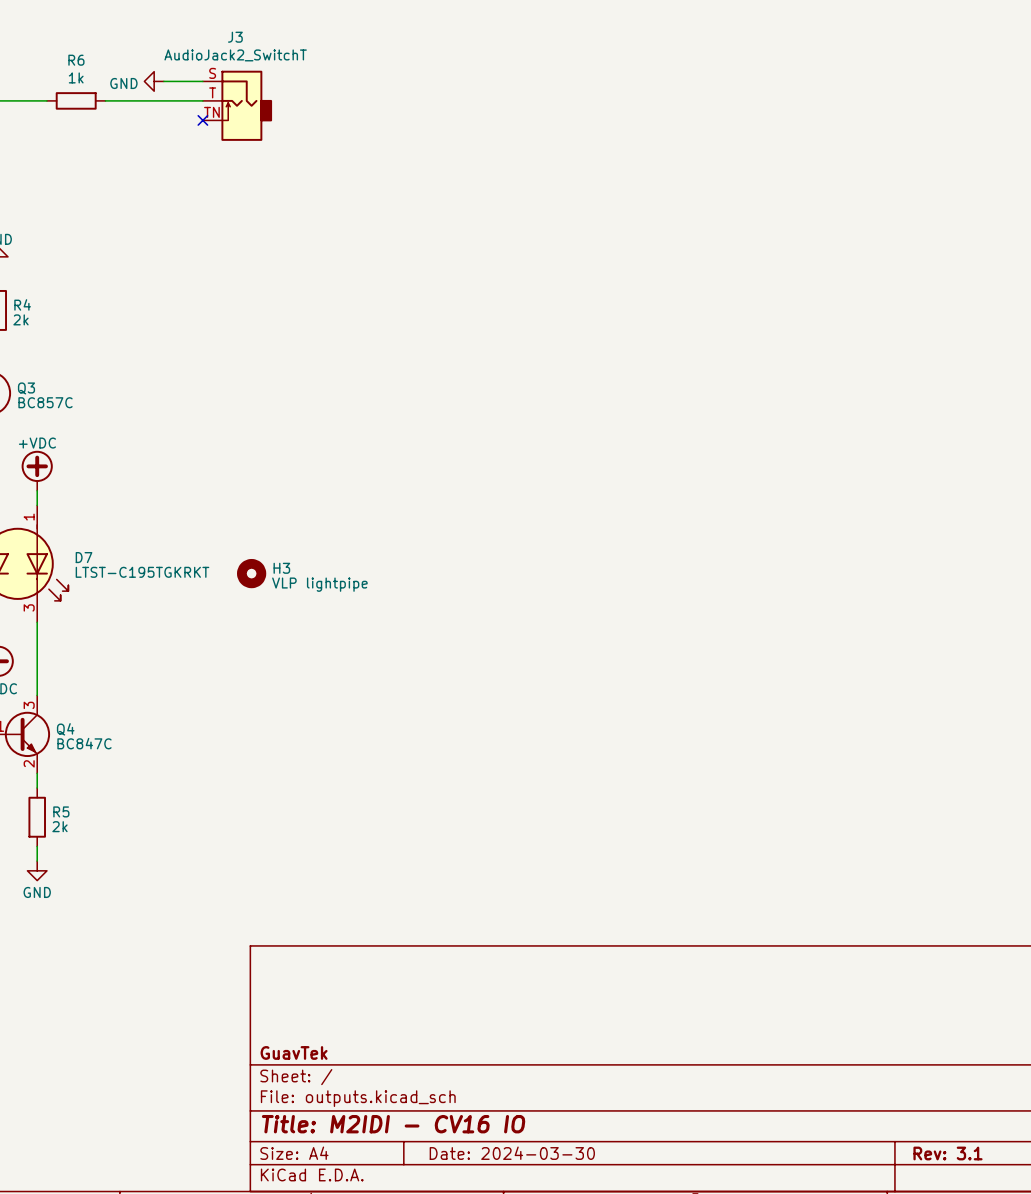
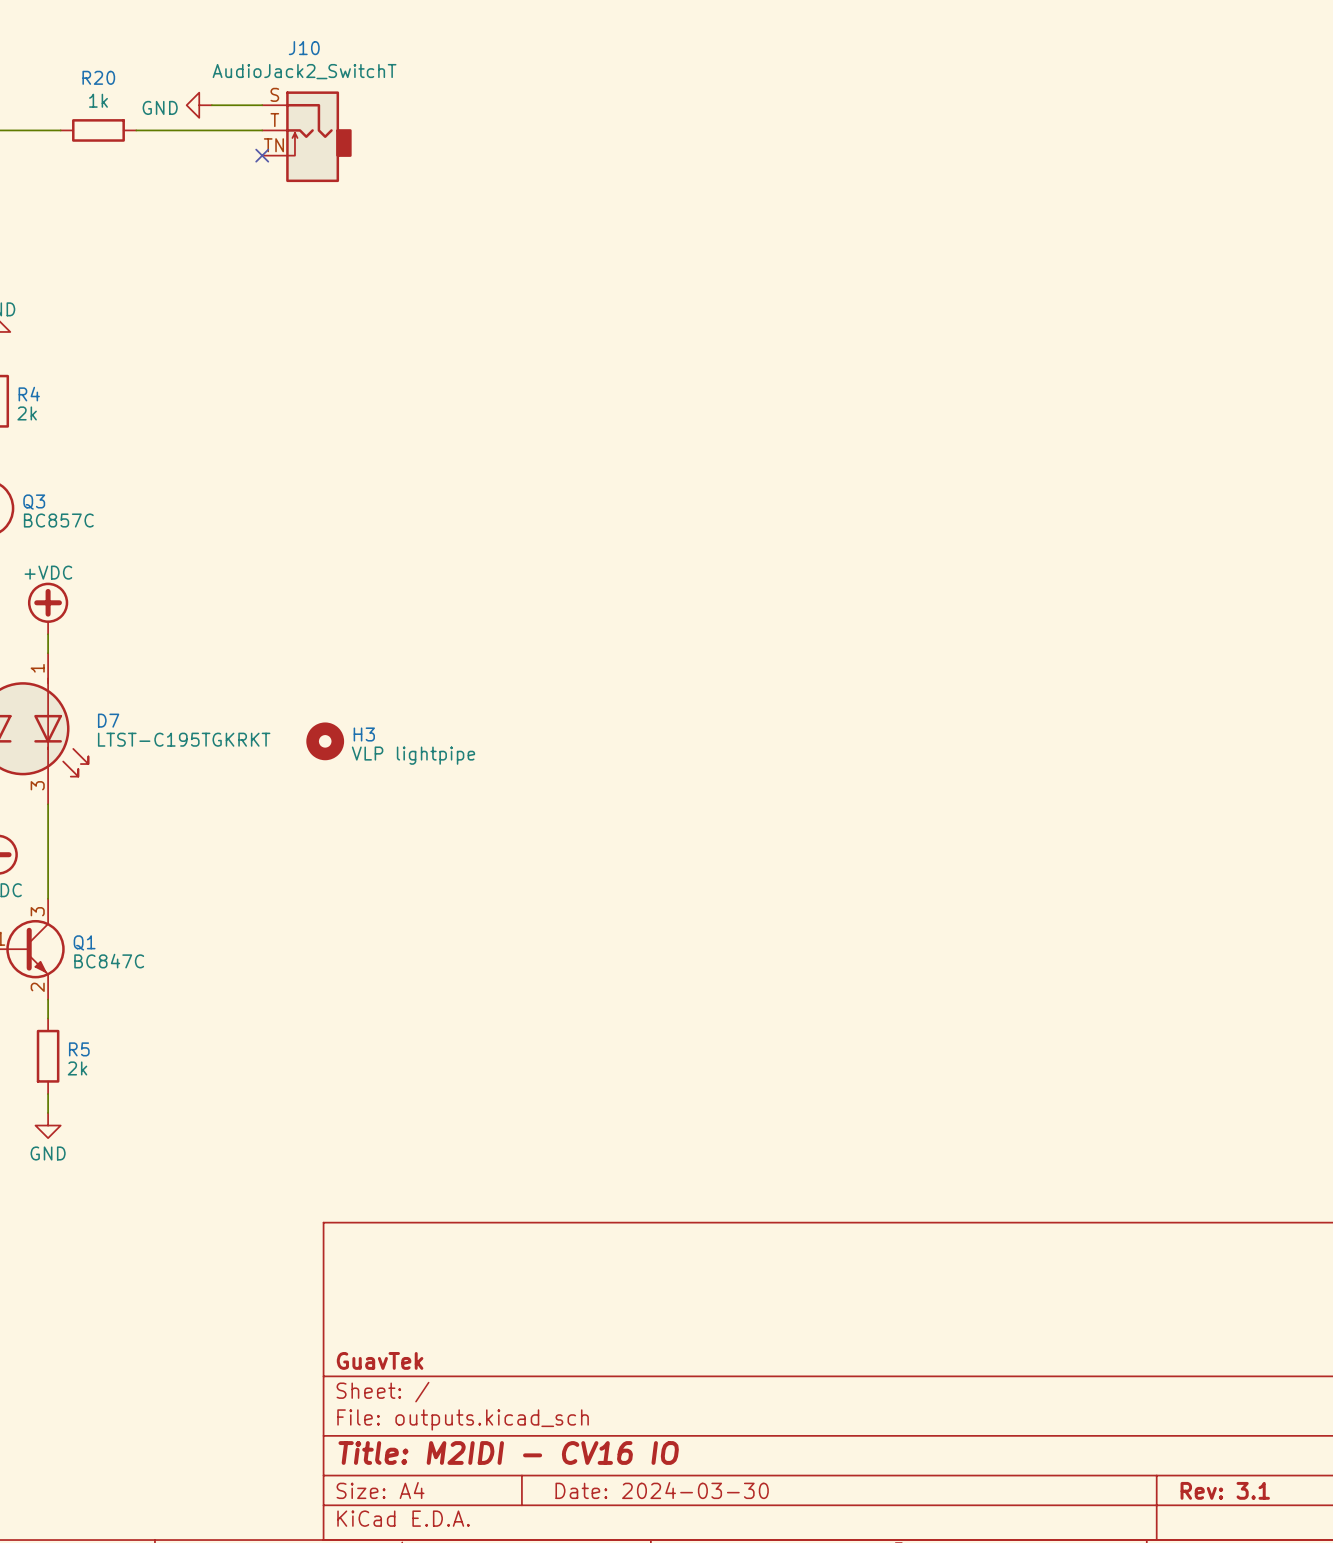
J3 name: J3 (235, 37) -> J10 (304, 48)
R6 name: R6 (76, 60) -> R20 (98, 77)
Q4 name: Q4 (65, 729) -> Q1 (84, 942)

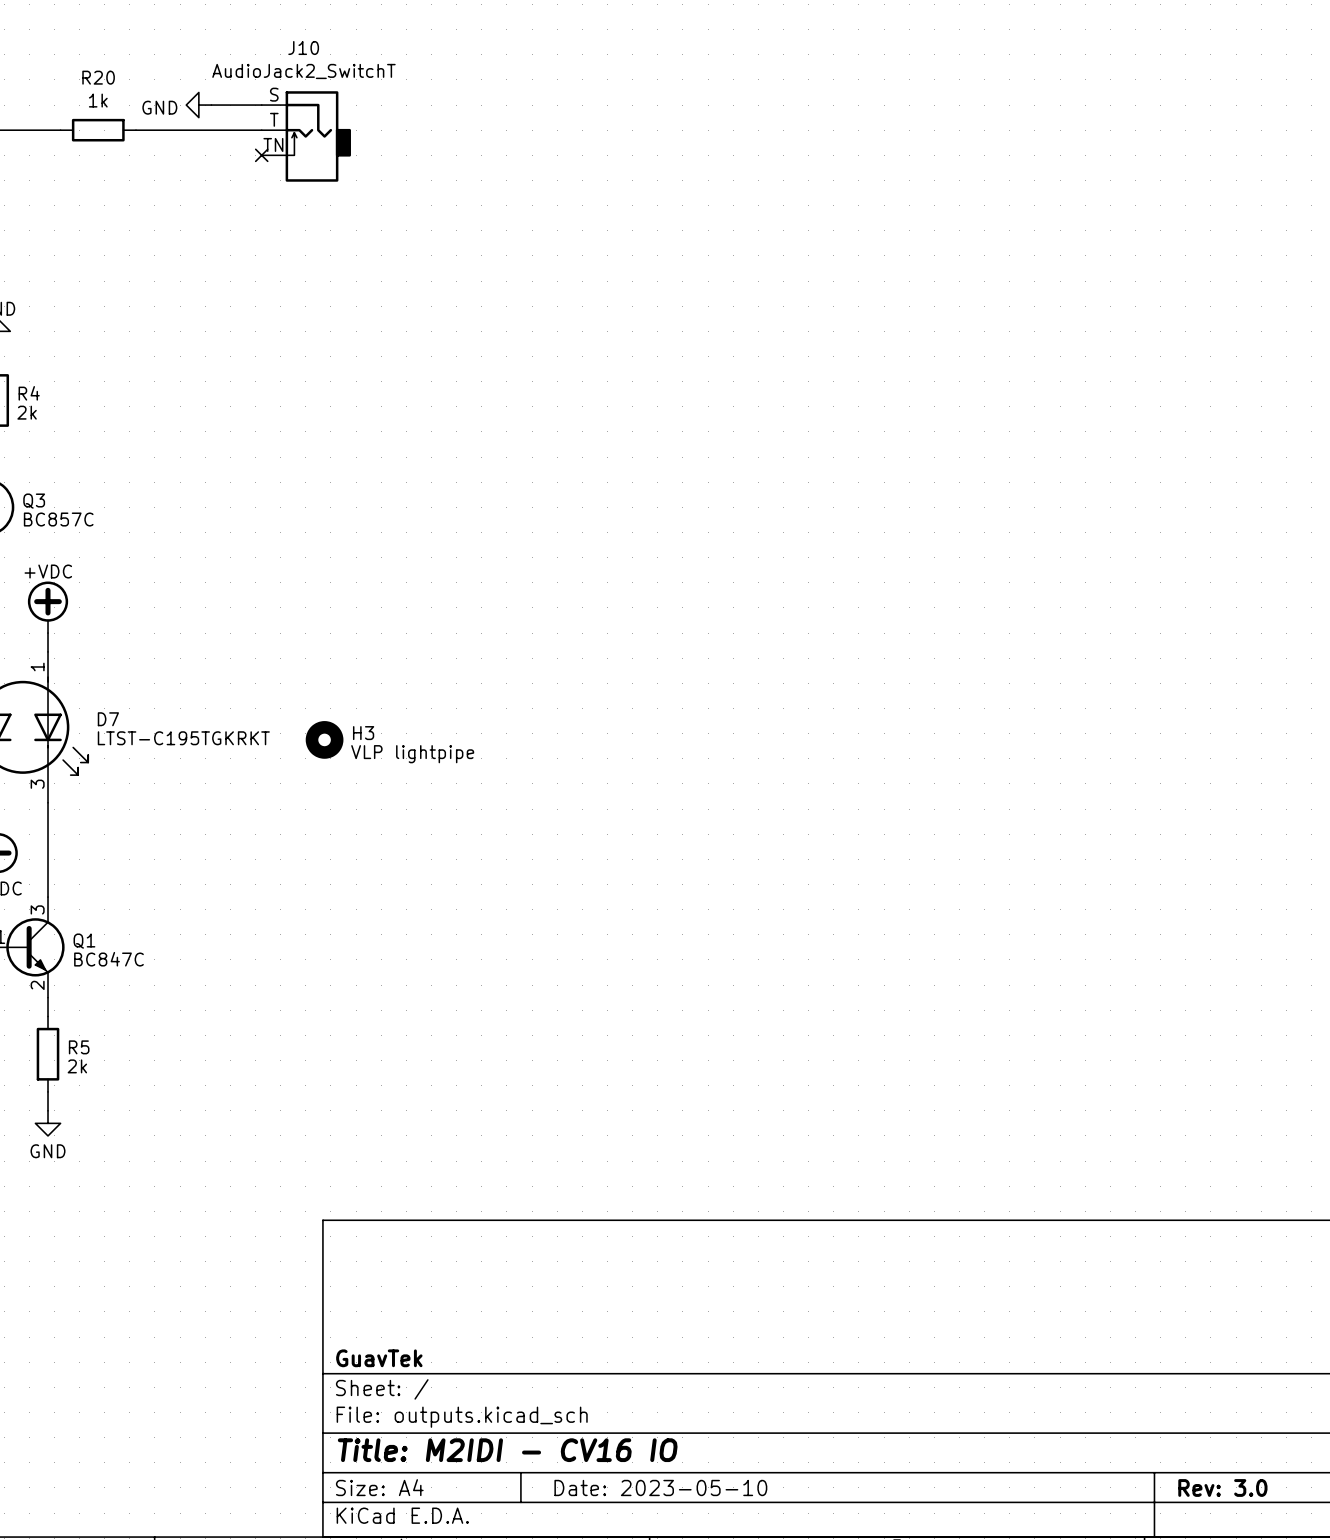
title block: Date: 2024-03-30 (662, 1490) -> Date: 2023-05-10 (660, 1487)
title block: Rev: 3.1 (1225, 1490) -> Rev: 3.0 (1222, 1487)

